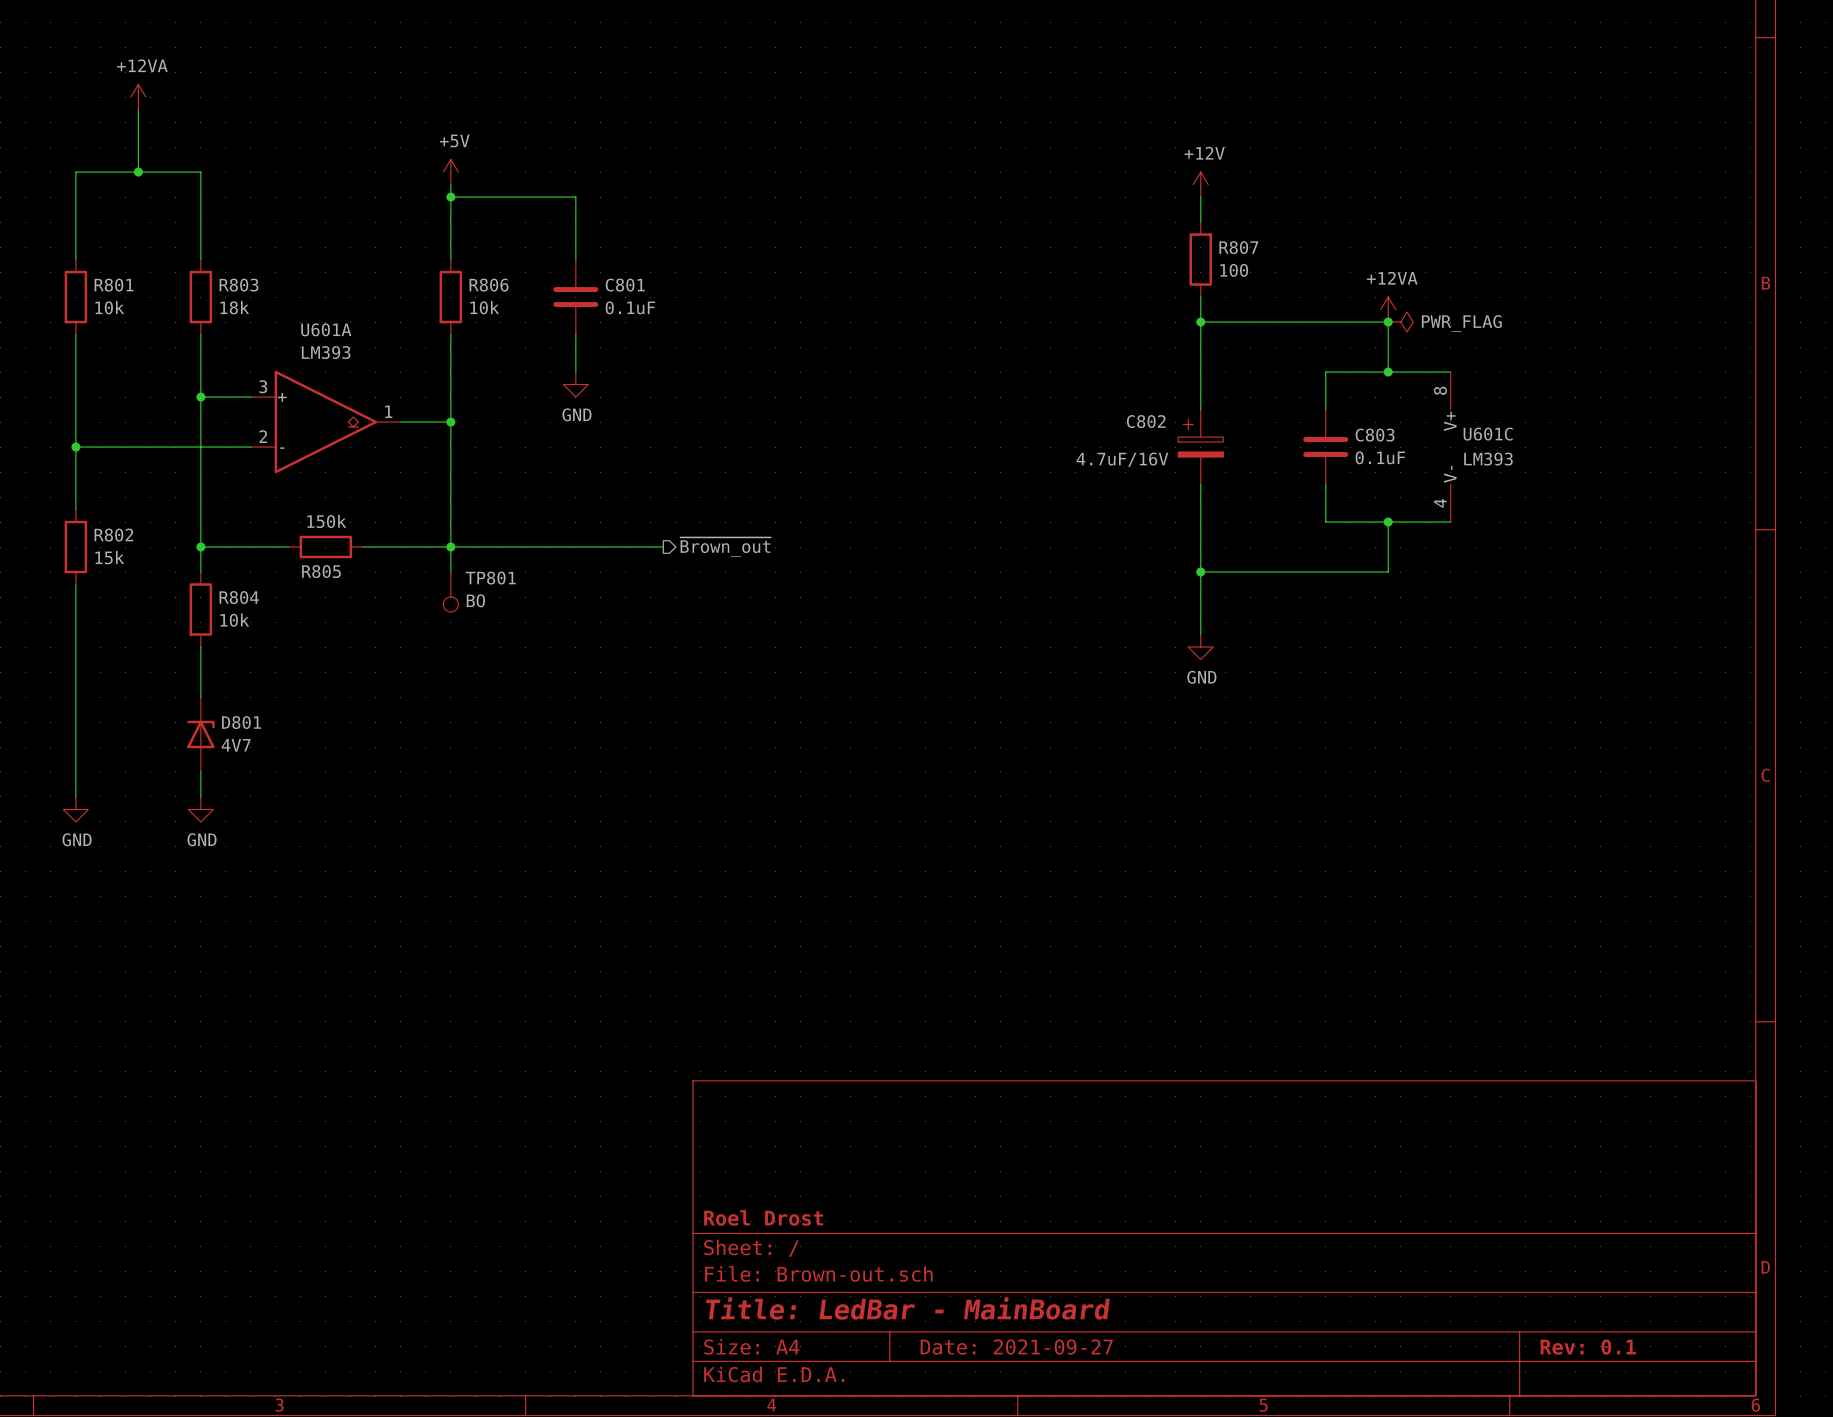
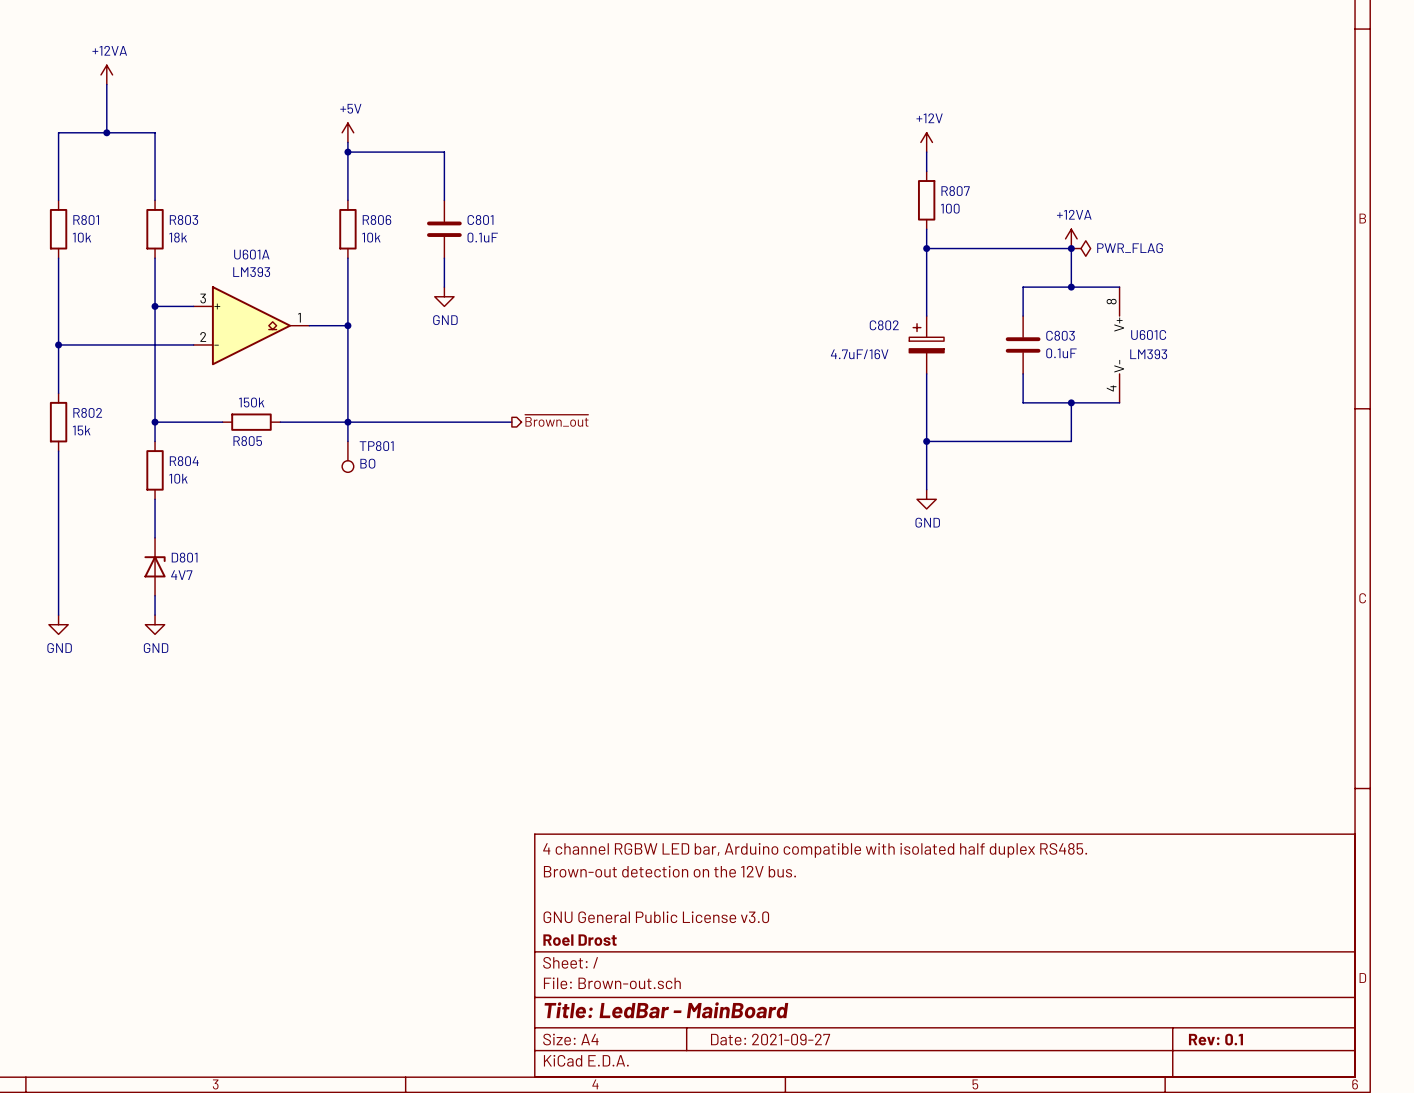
title block: none -> 4 channel RGBW LED bar, Arduino compatible with isolated half duplex RS485. (815, 850)
title block: none -> Brown-out detection on the 12V bus. (669, 871)
title block: none -> GNU General Public License v3.0 (656, 917)

